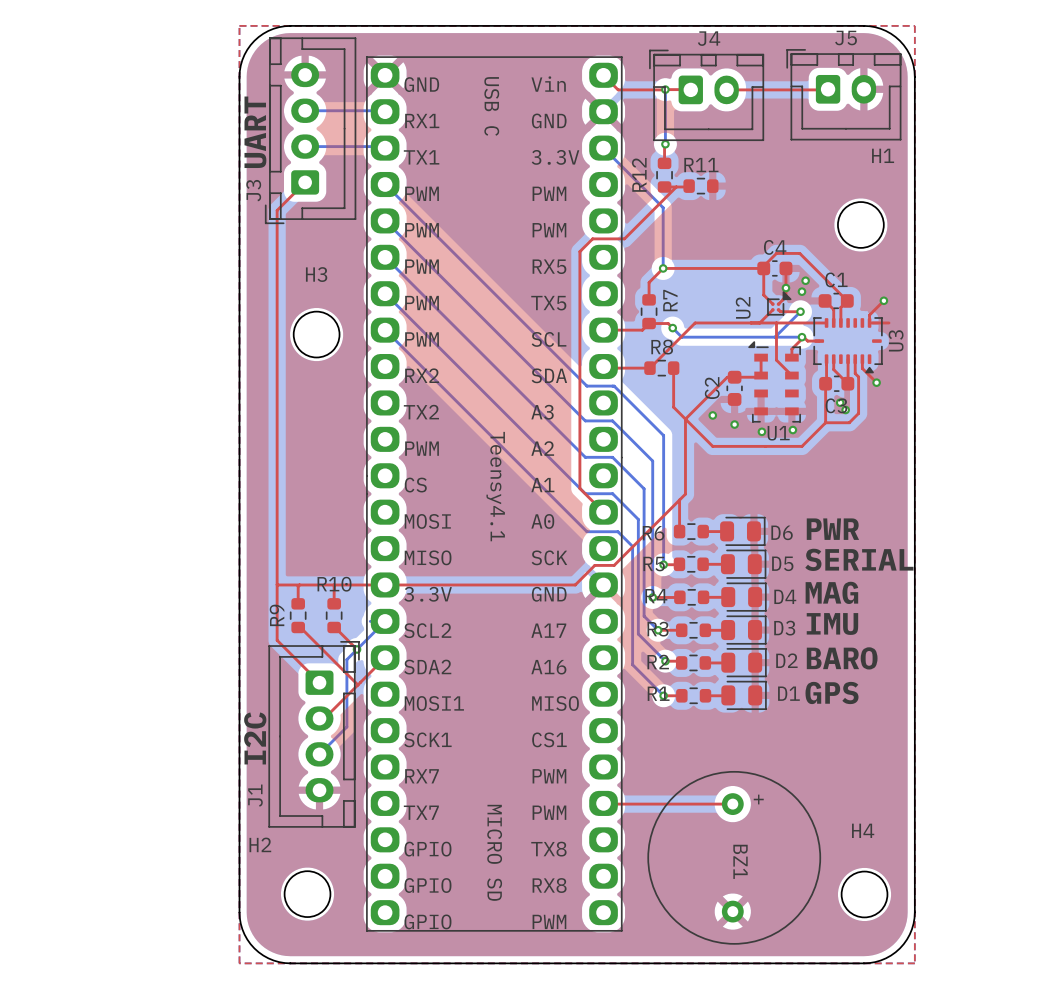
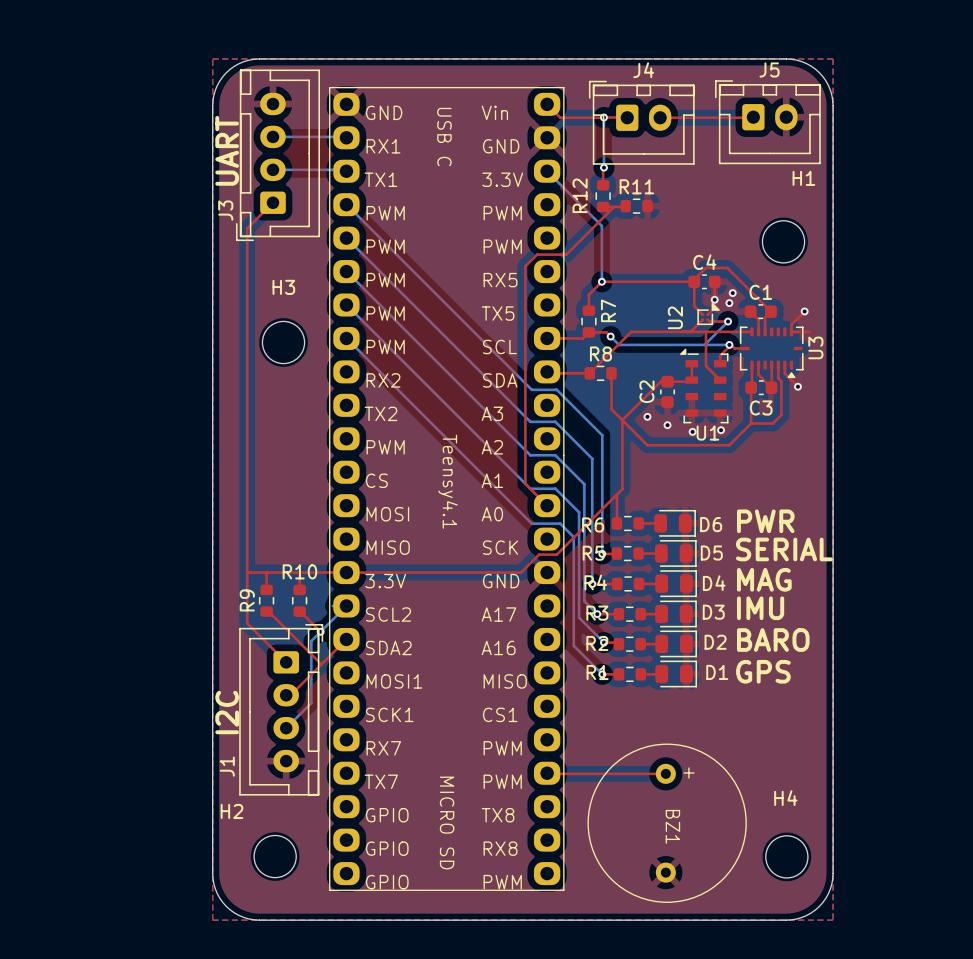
via: (840, 402) -> none
via: (845, 409) -> none

